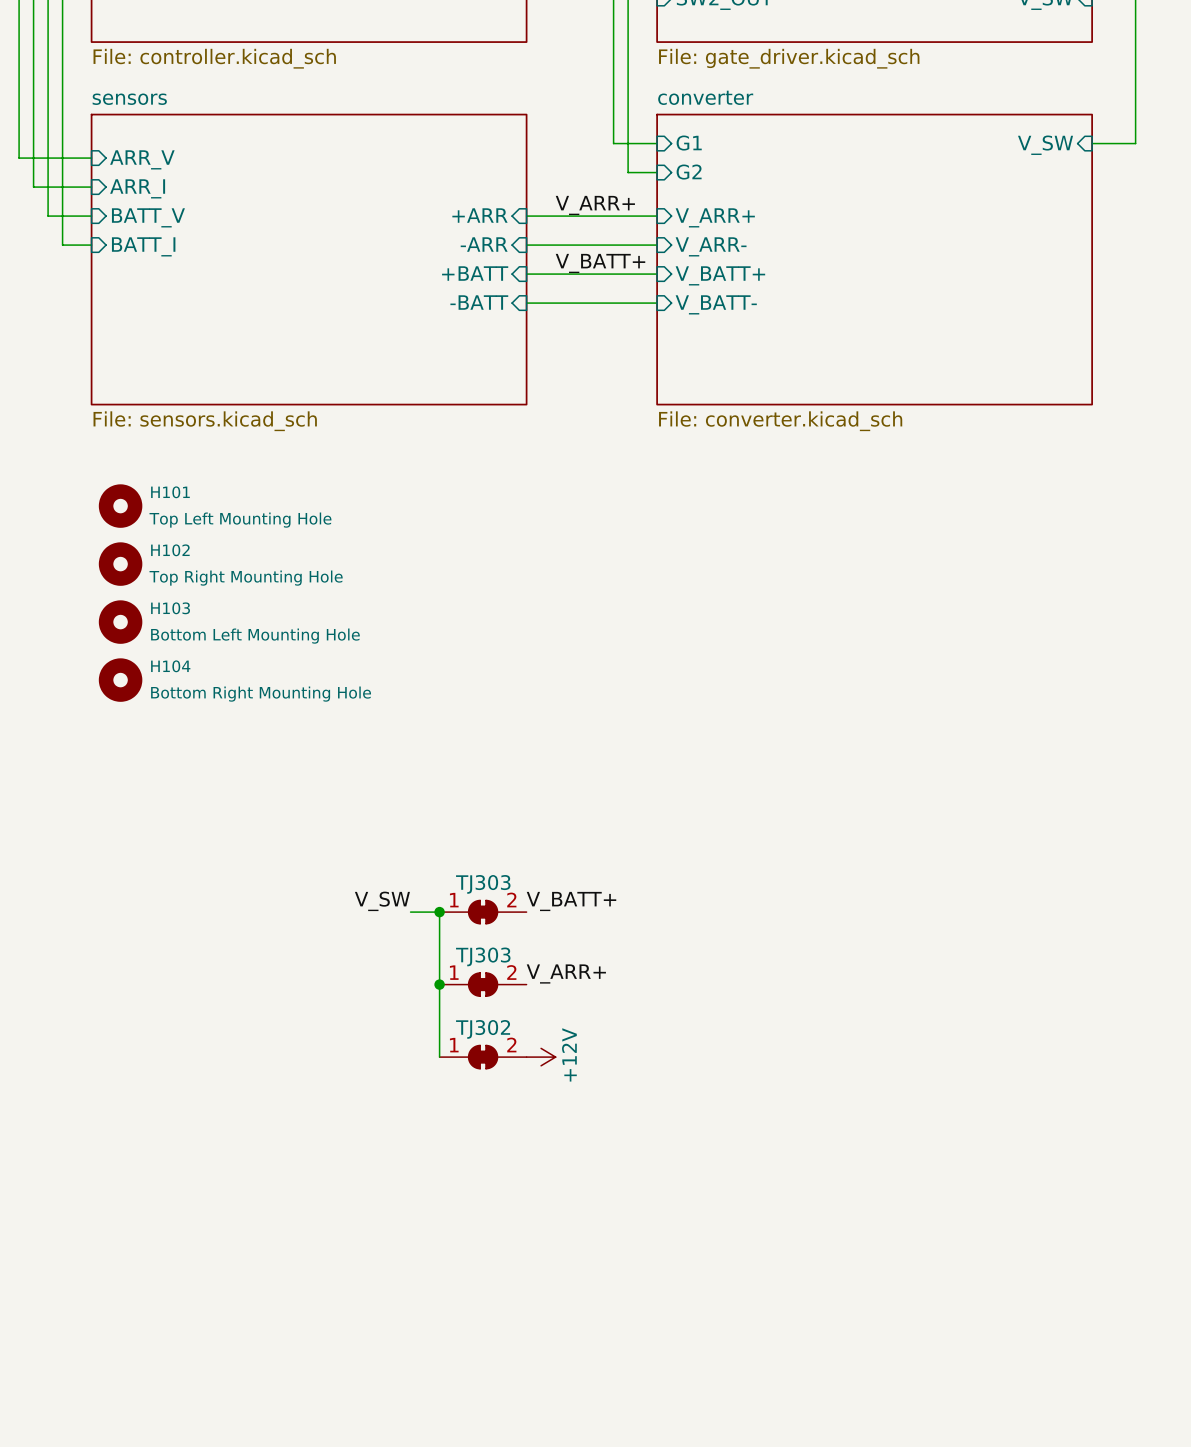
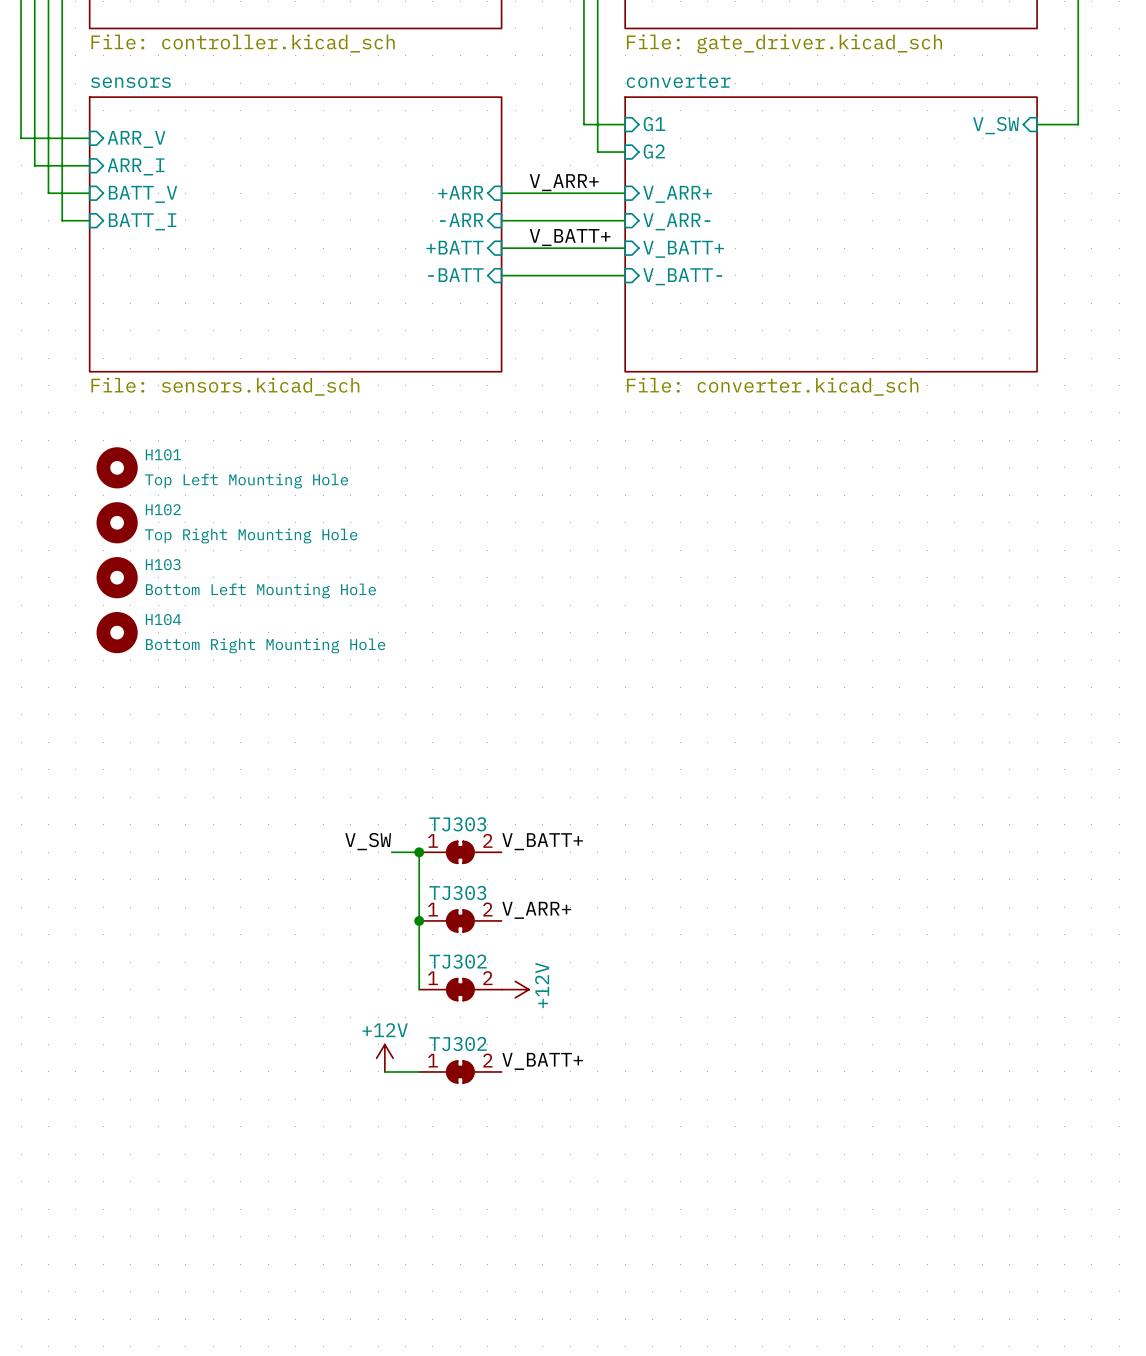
power symbol: none -> +12V (384, 1058)
label: none -> V_BATT+ (542, 1061)
wire: none -> (384, 1071) (419, 1071)
TJ302: none -> (460, 1071)

